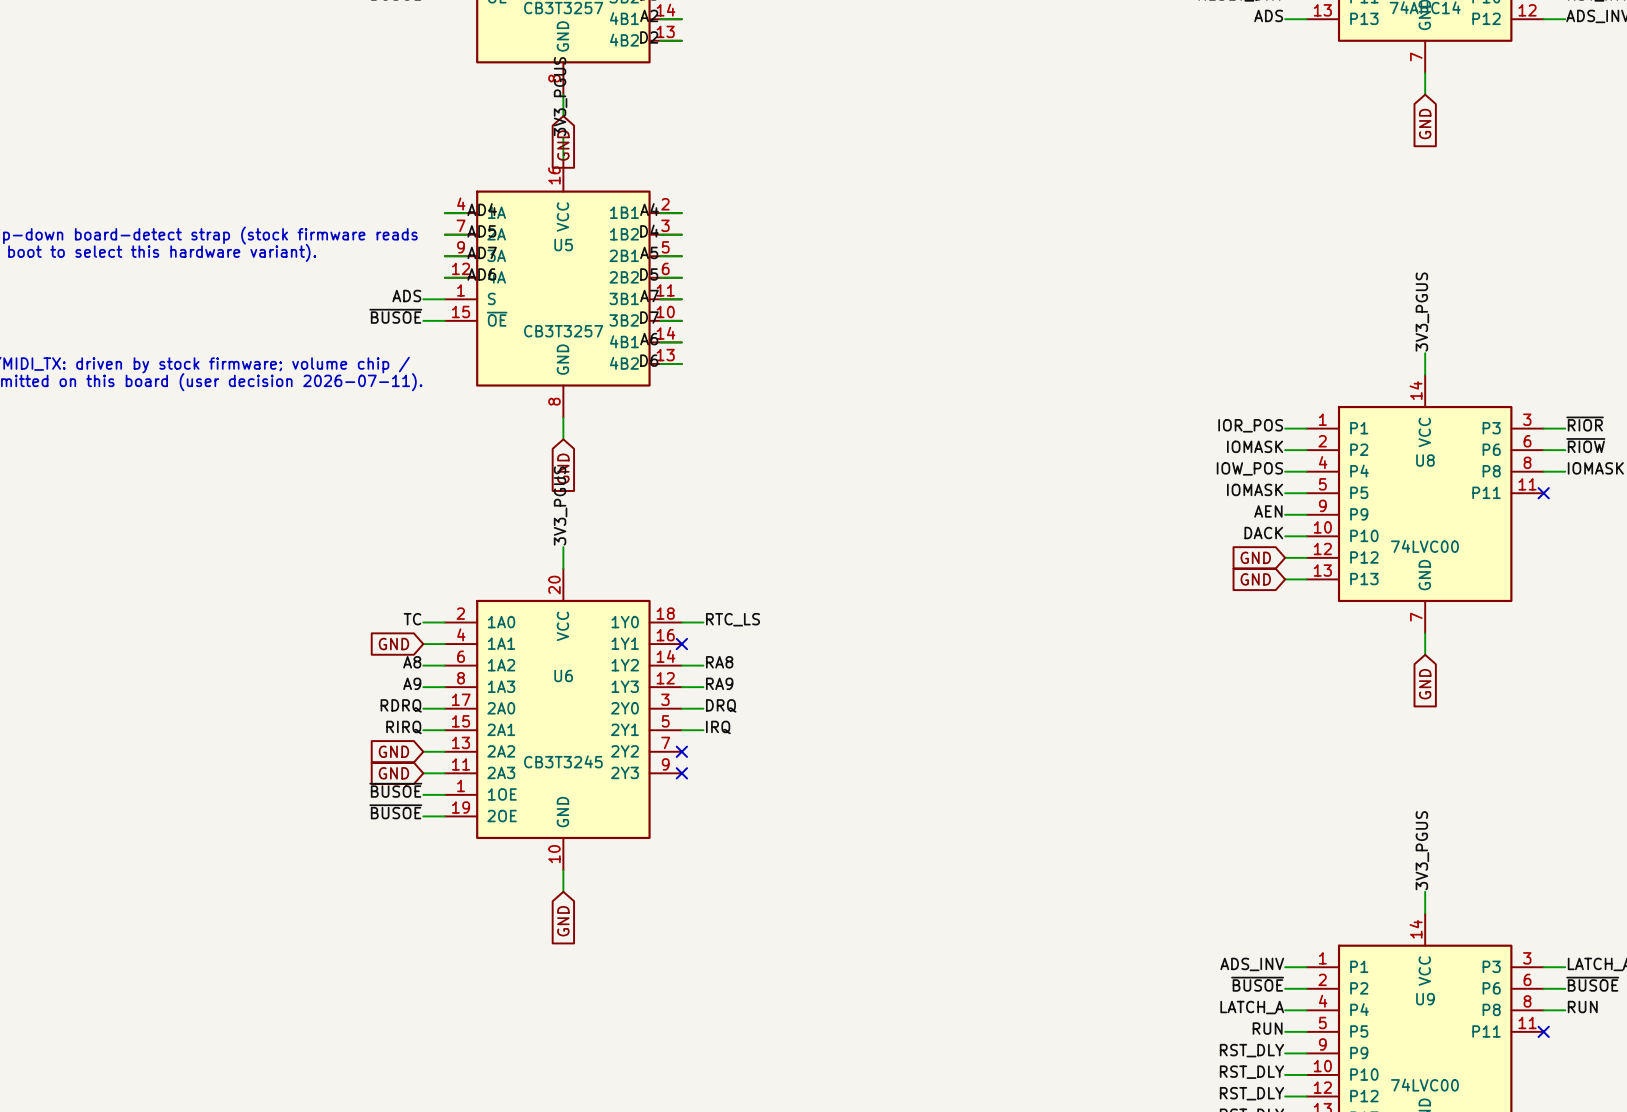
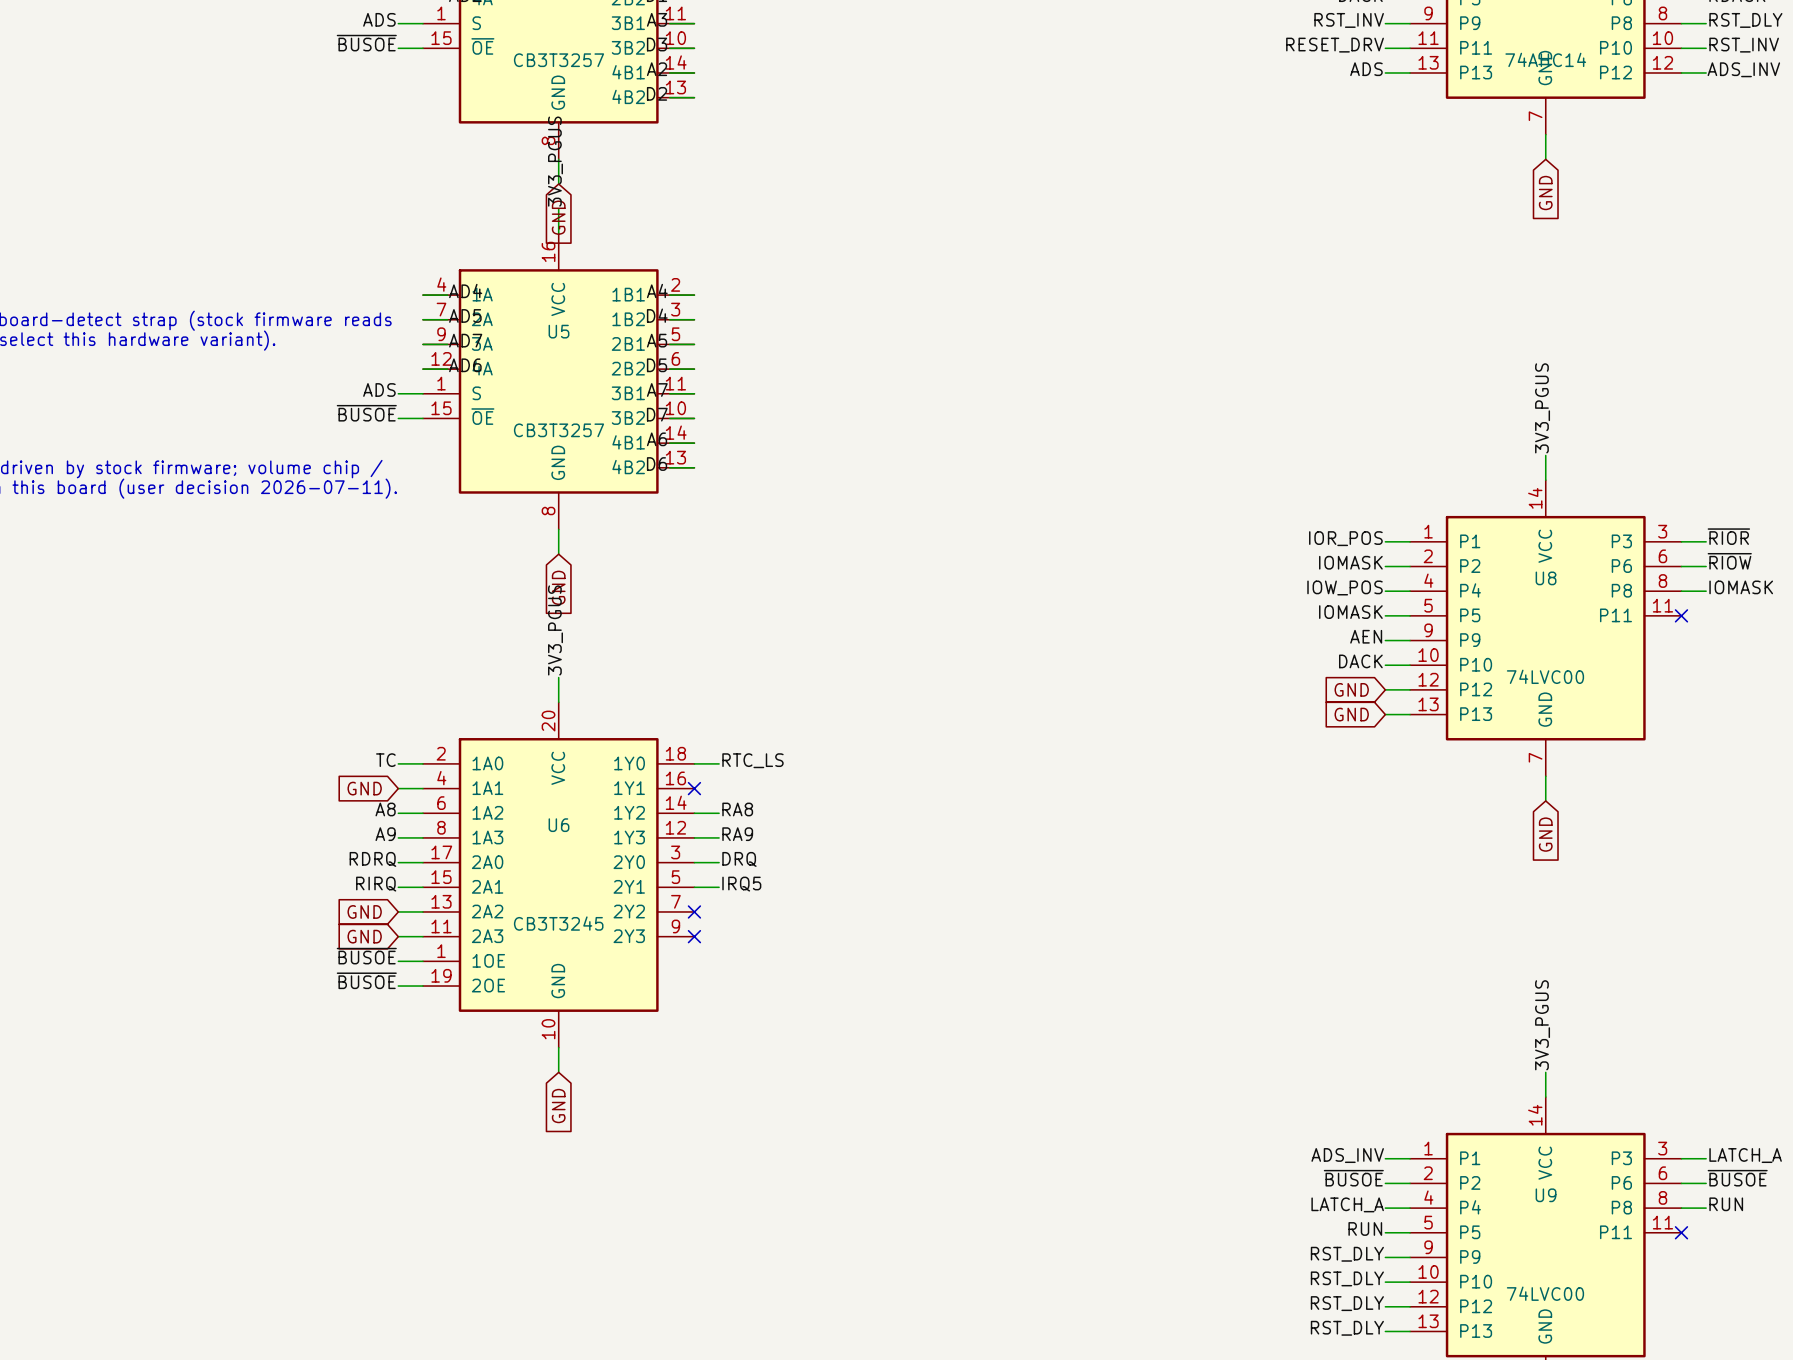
label: IRQ (718, 727) -> IRQ5 (741, 884)

